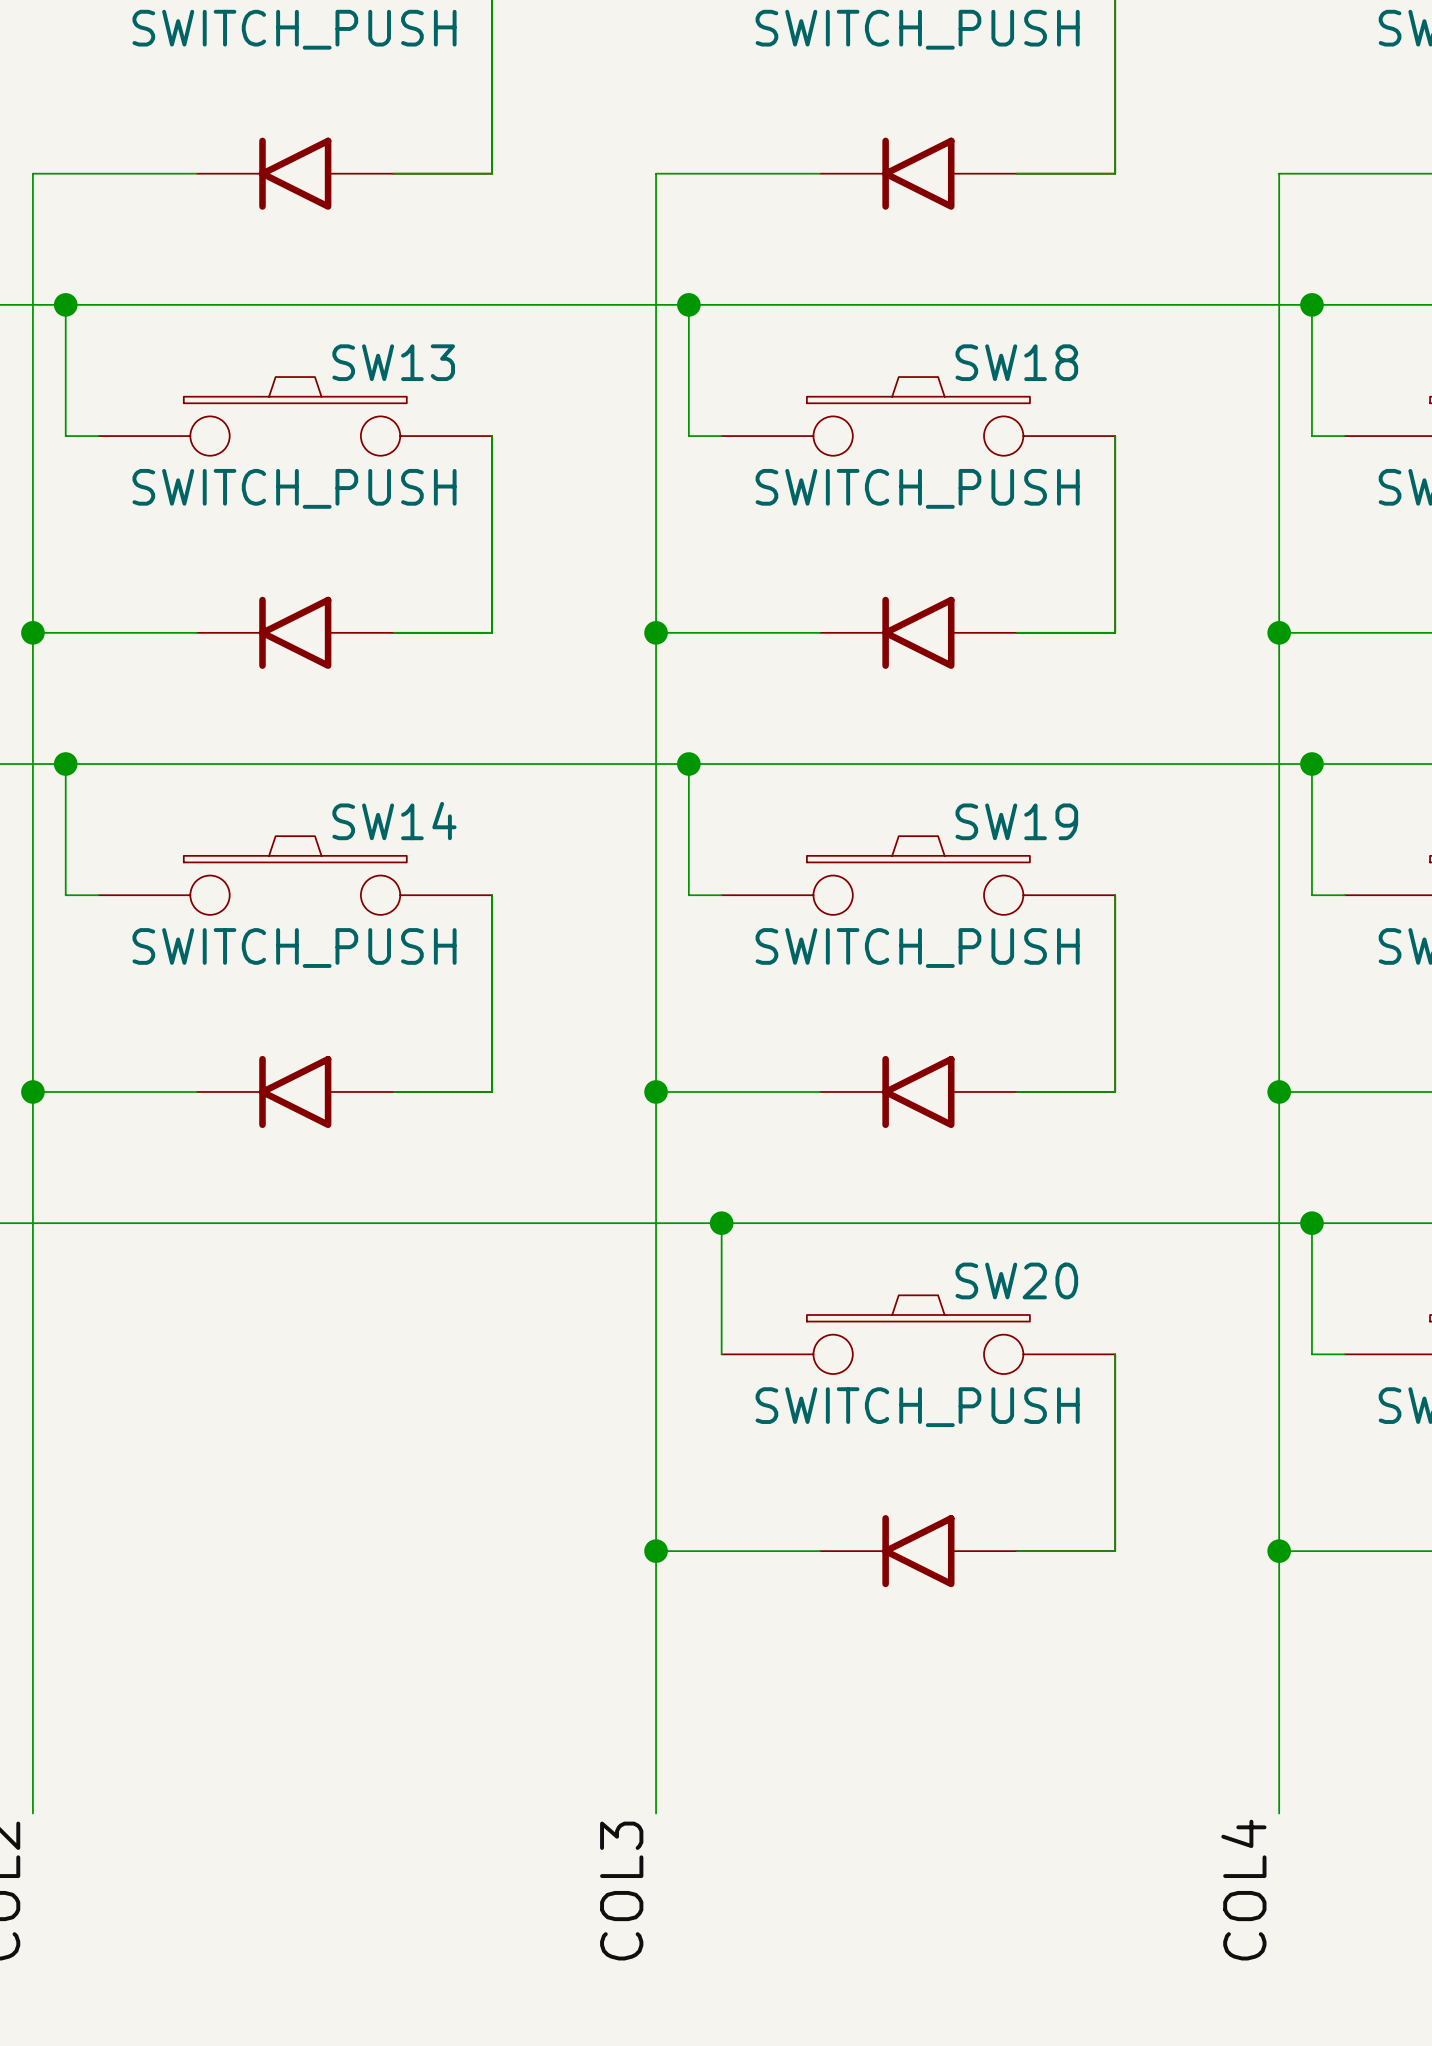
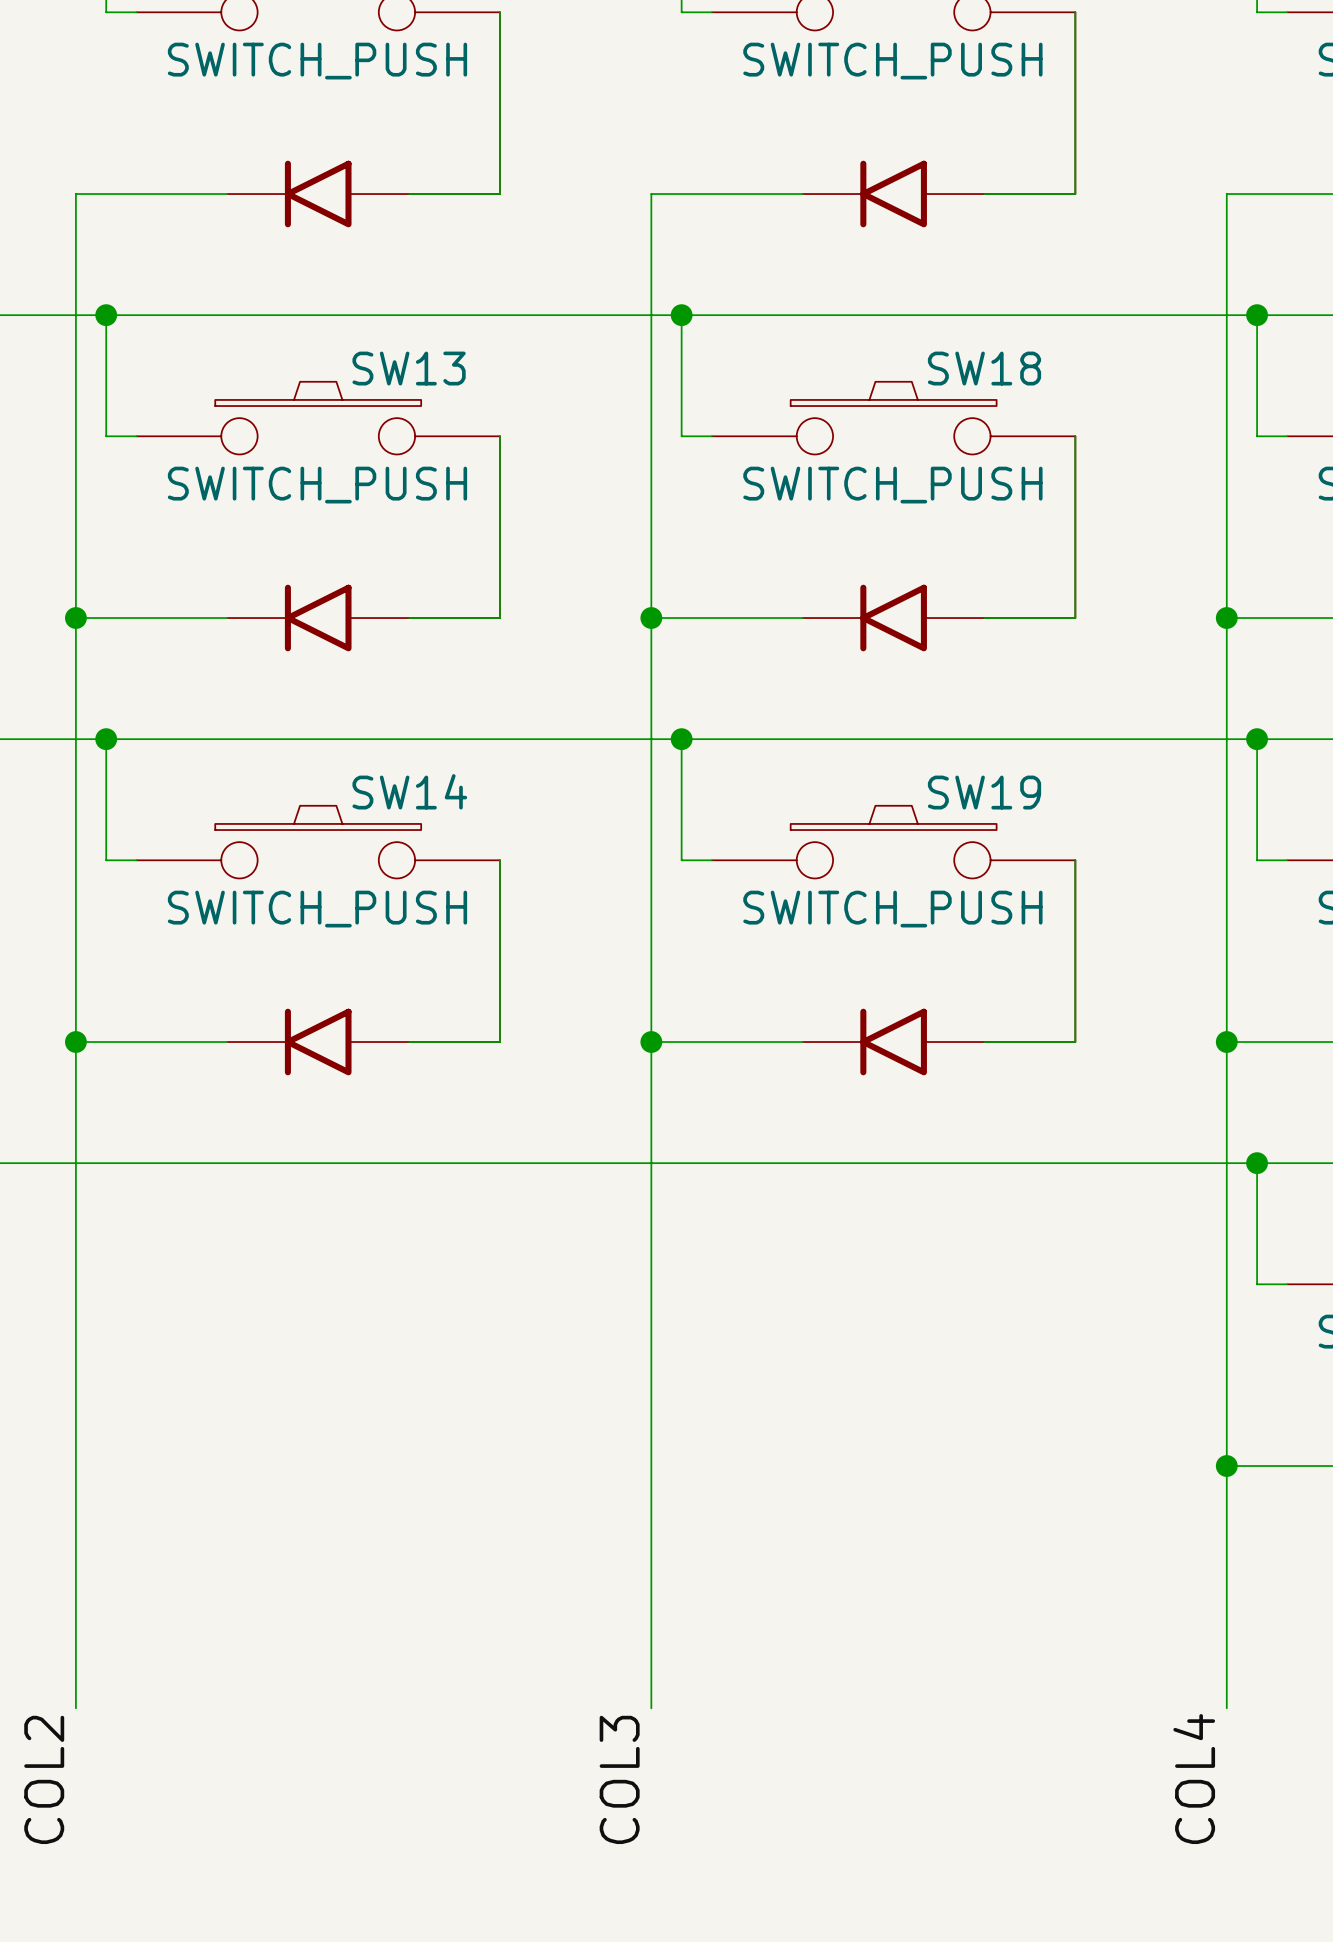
wire: (721, 1223) (721, 1354) -> none
junction: (721, 1223) -> none
wire: (1115, 1354) (1115, 1551) (1016, 1551) -> none
SW20: SWITCH_PUSH (918, 1441) -> none
wire: (656, 1551) (820, 1551) -> none
junction: (656, 1551) -> none

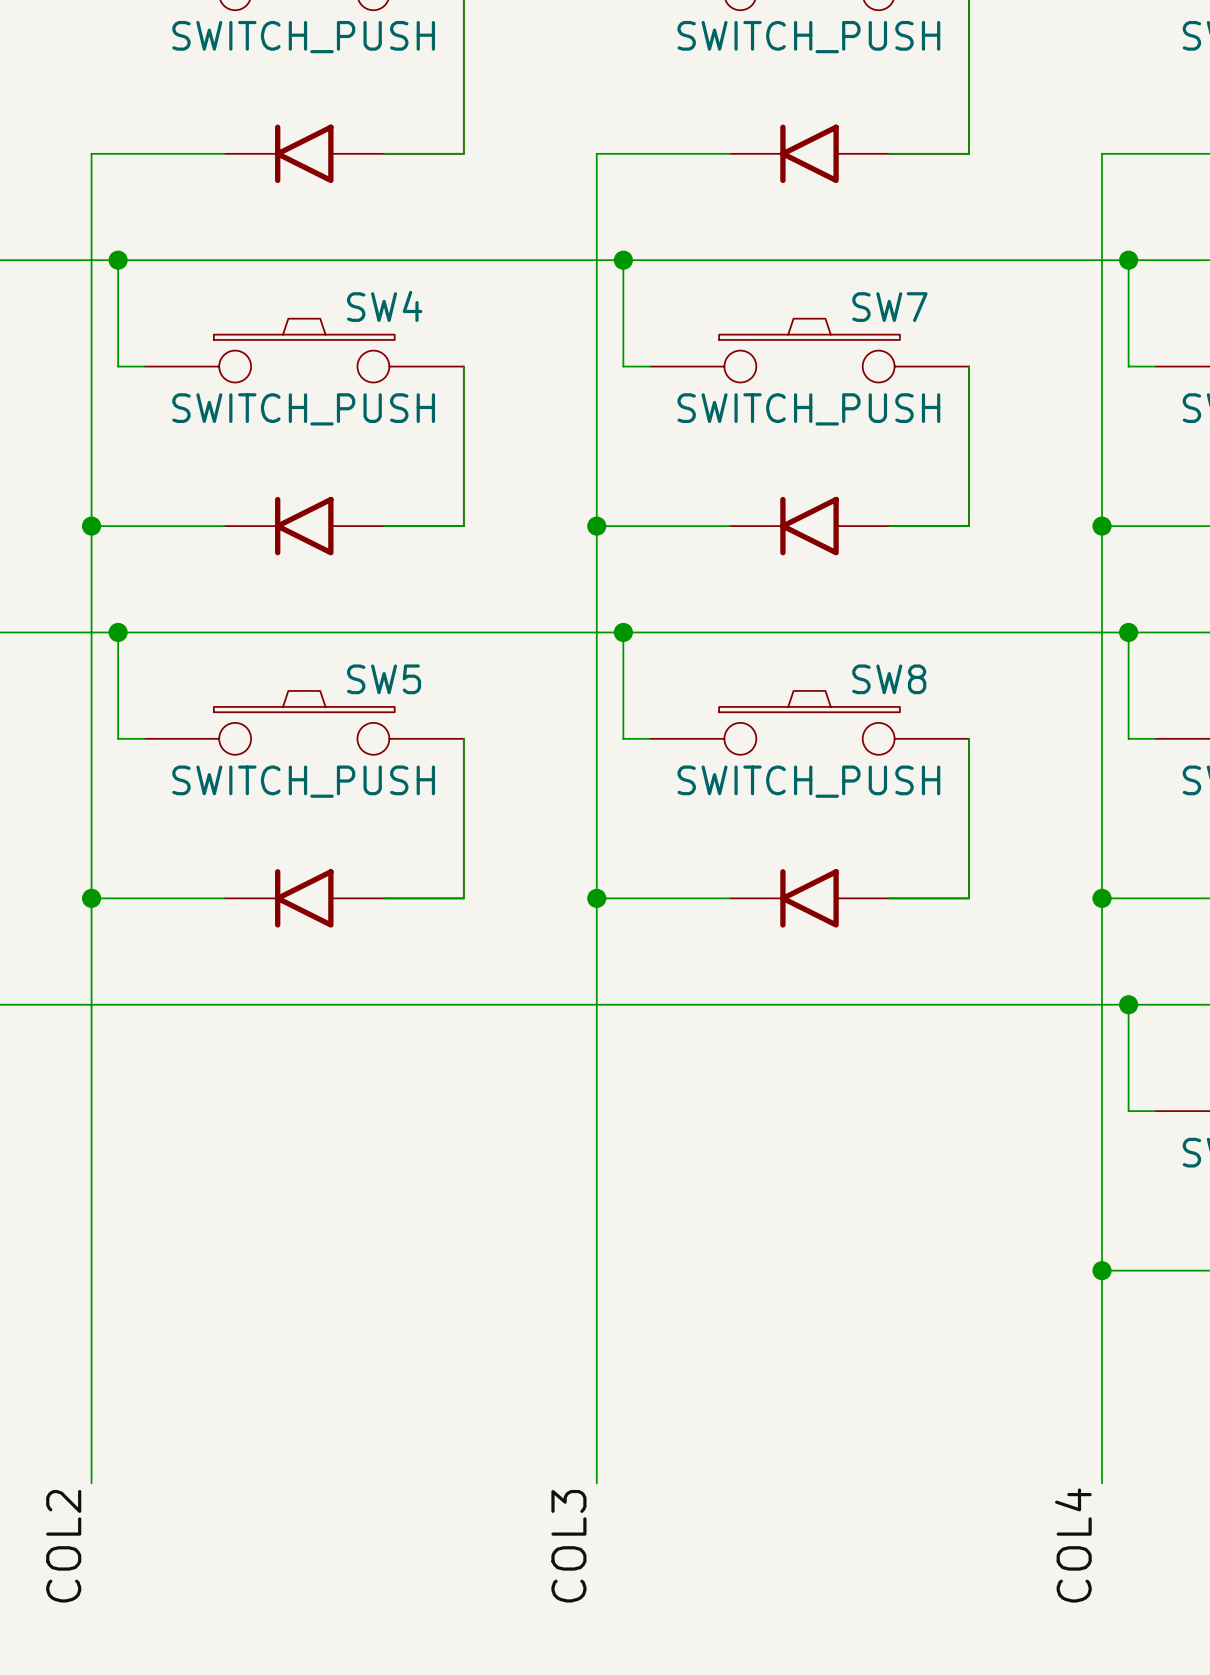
SW13 name: SW13 (409, 368) -> SW4 (384, 306)
SW18 name: SW18 (984, 368) -> SW7 (889, 307)
SW14 name: SW14 (409, 791) -> SW5 (384, 679)
SW19 name: SW19 (984, 792) -> SW8 (889, 679)

